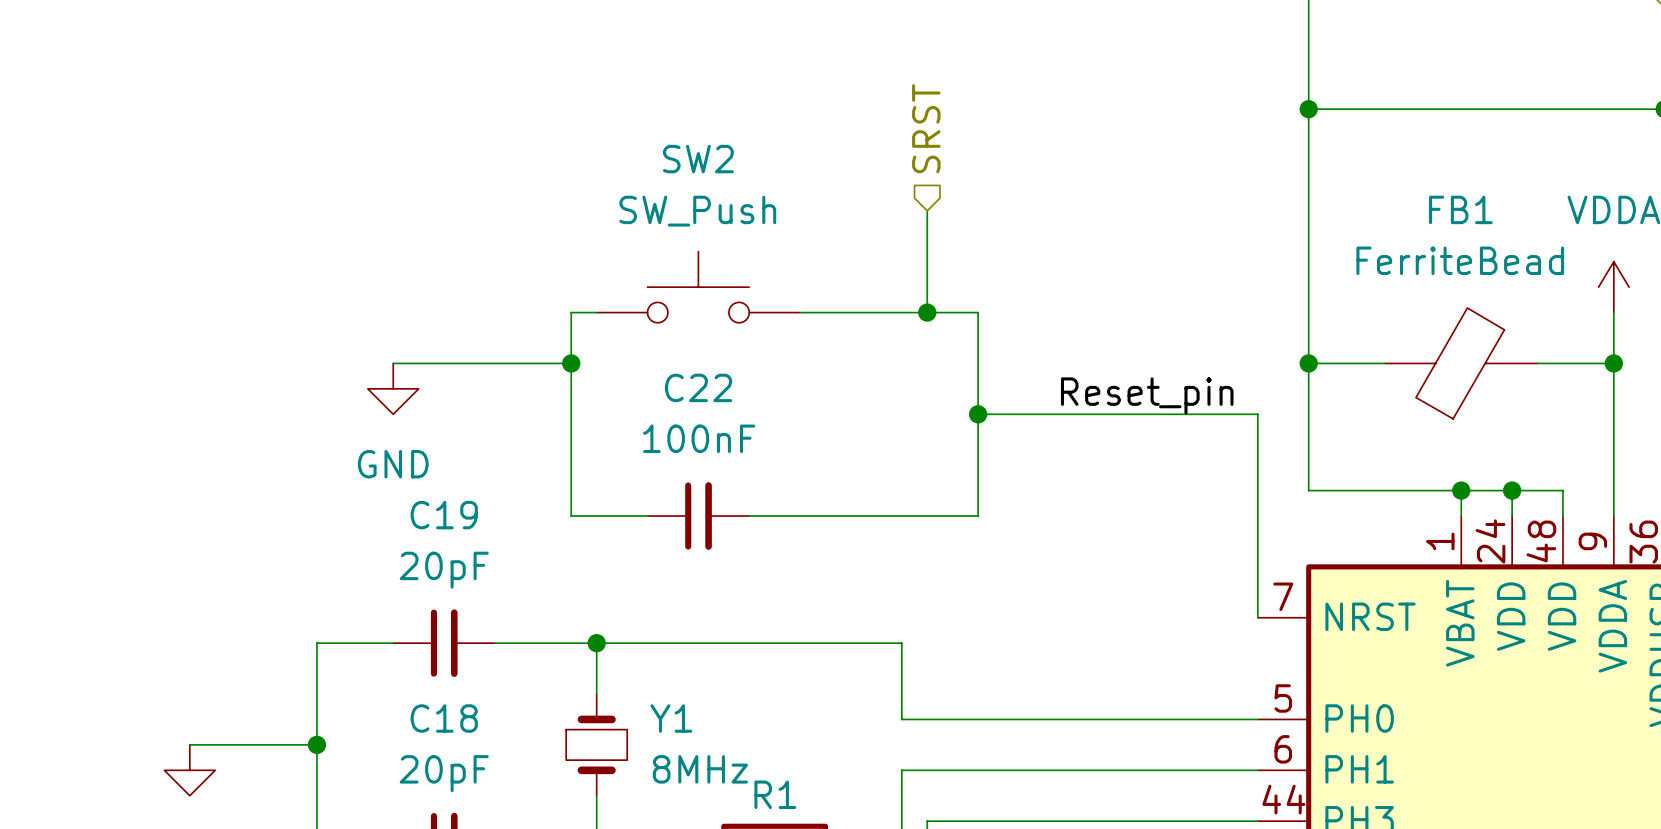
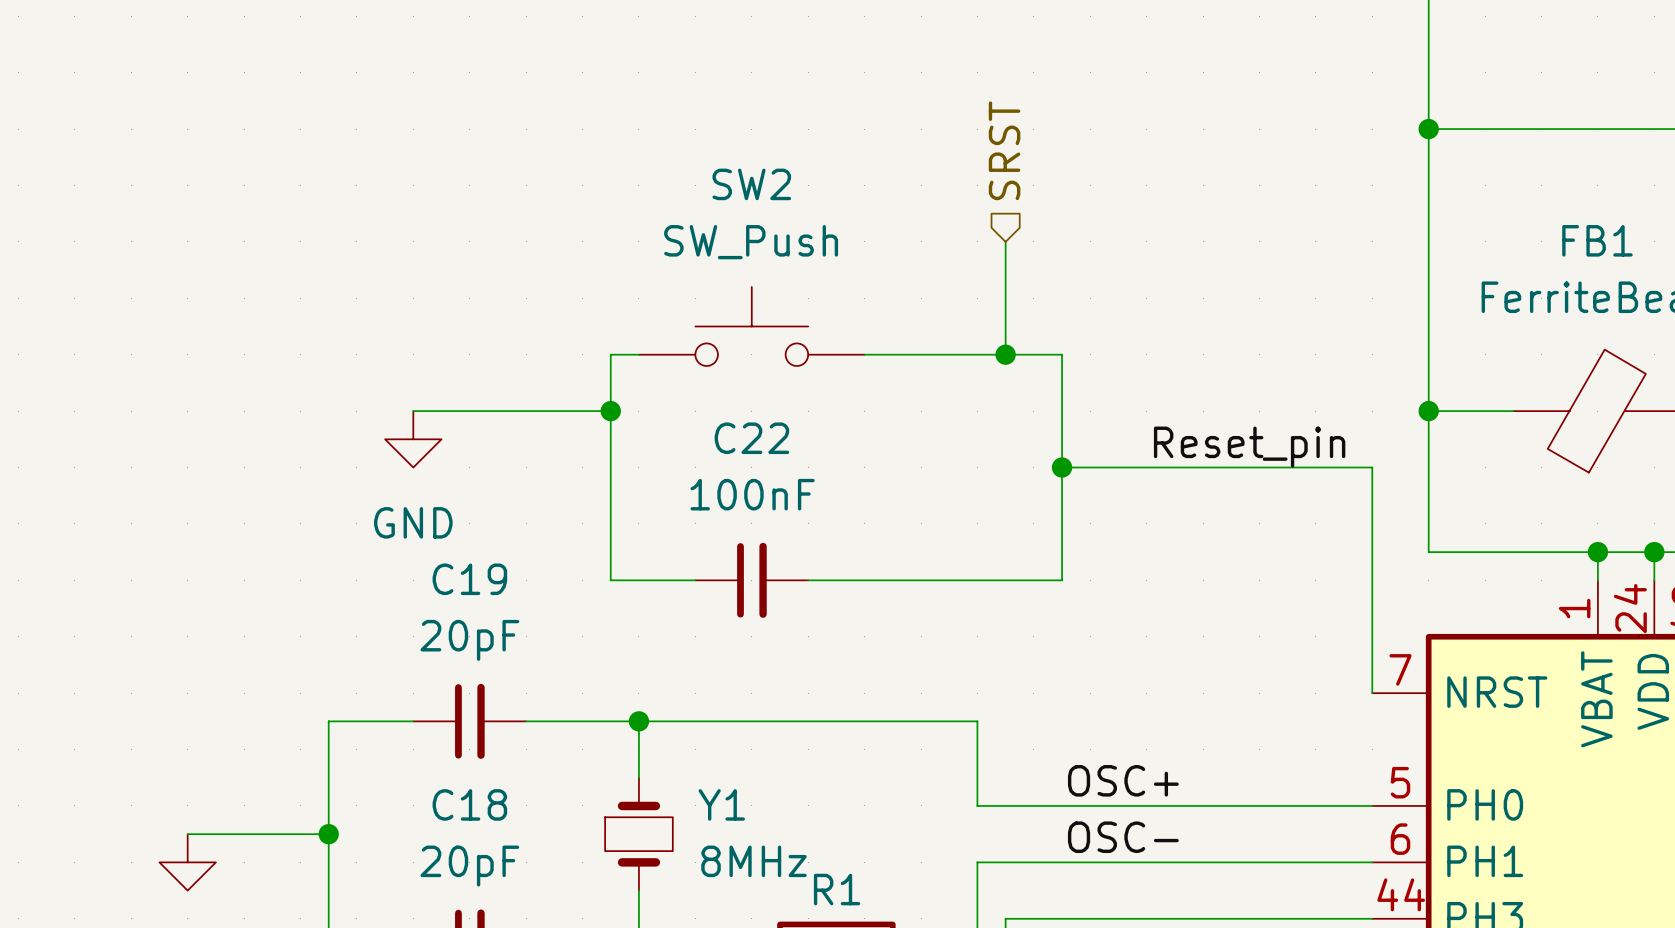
label: none -> OSC+ (1123, 780)
label: none -> OSC- (1123, 837)

